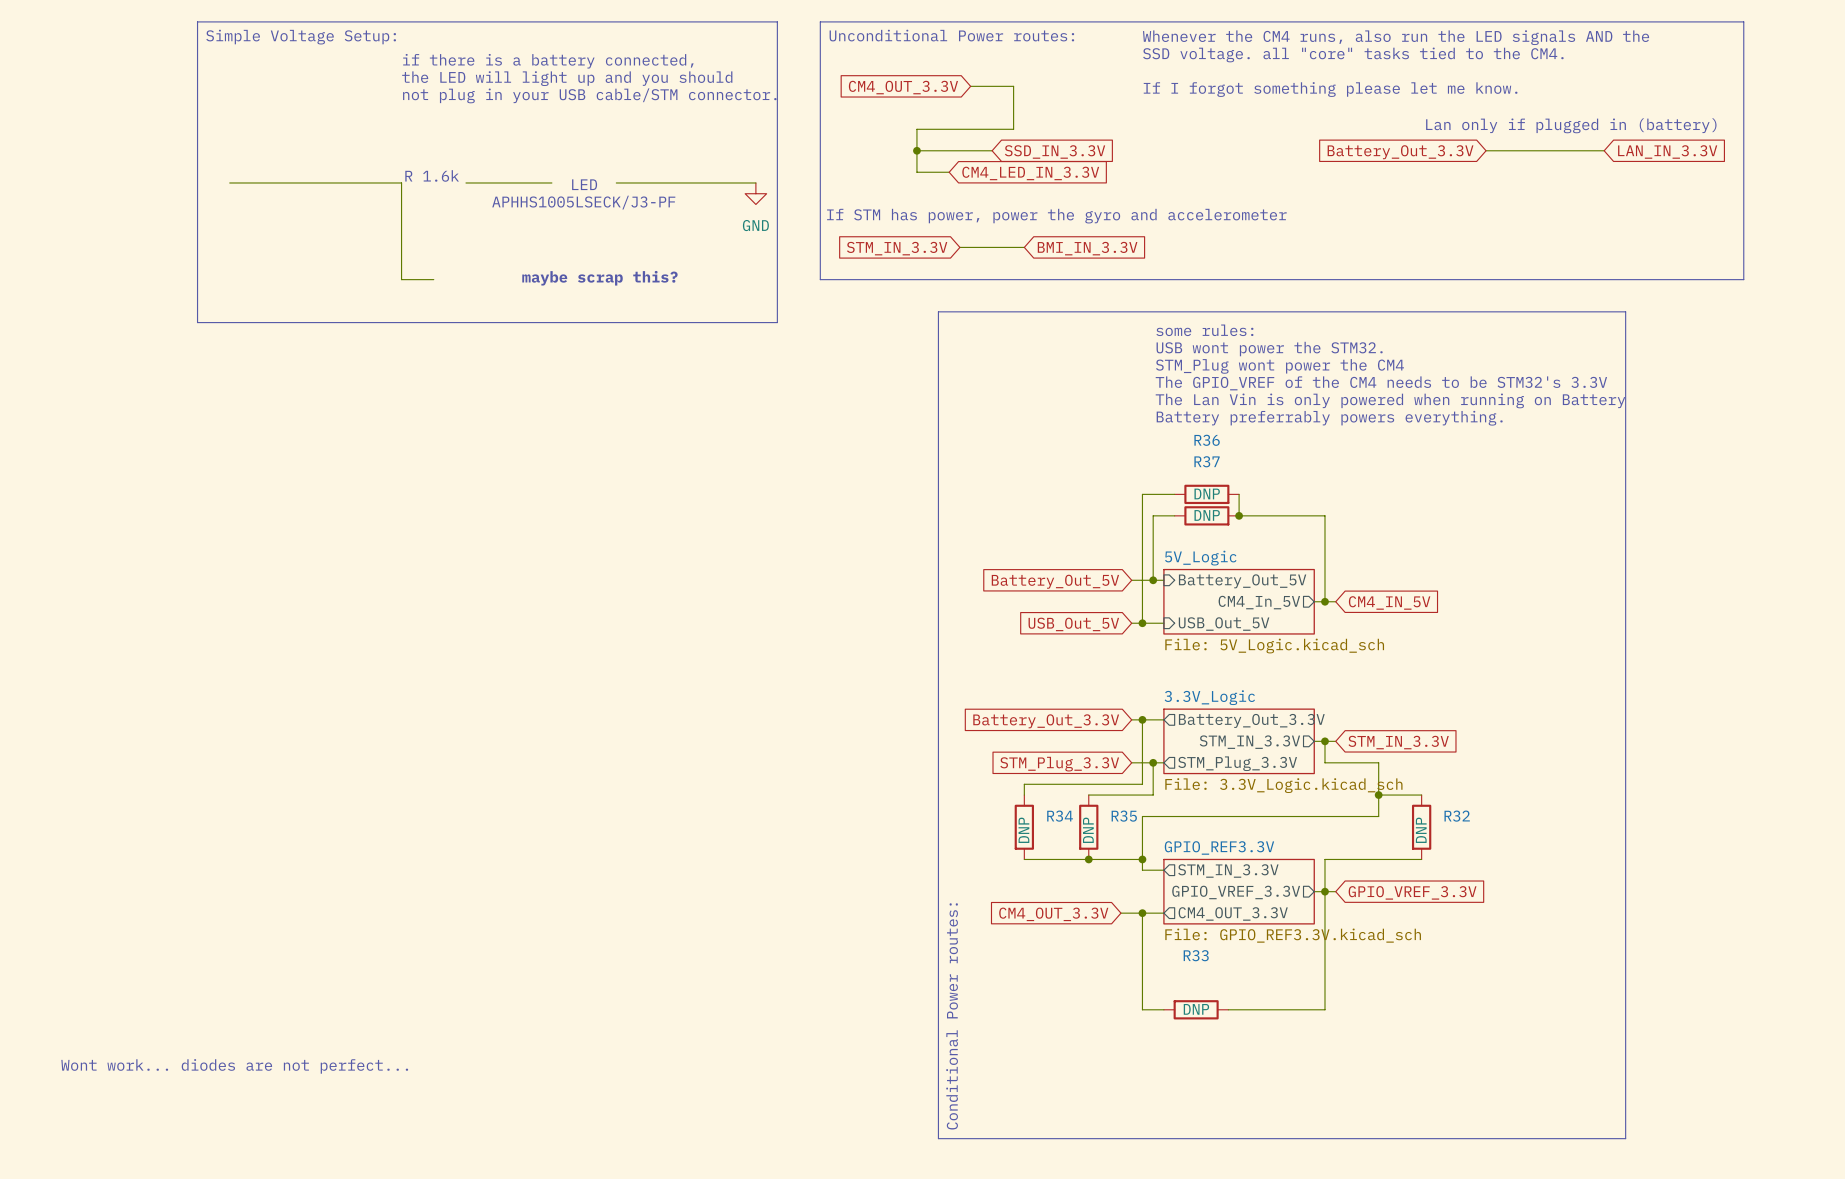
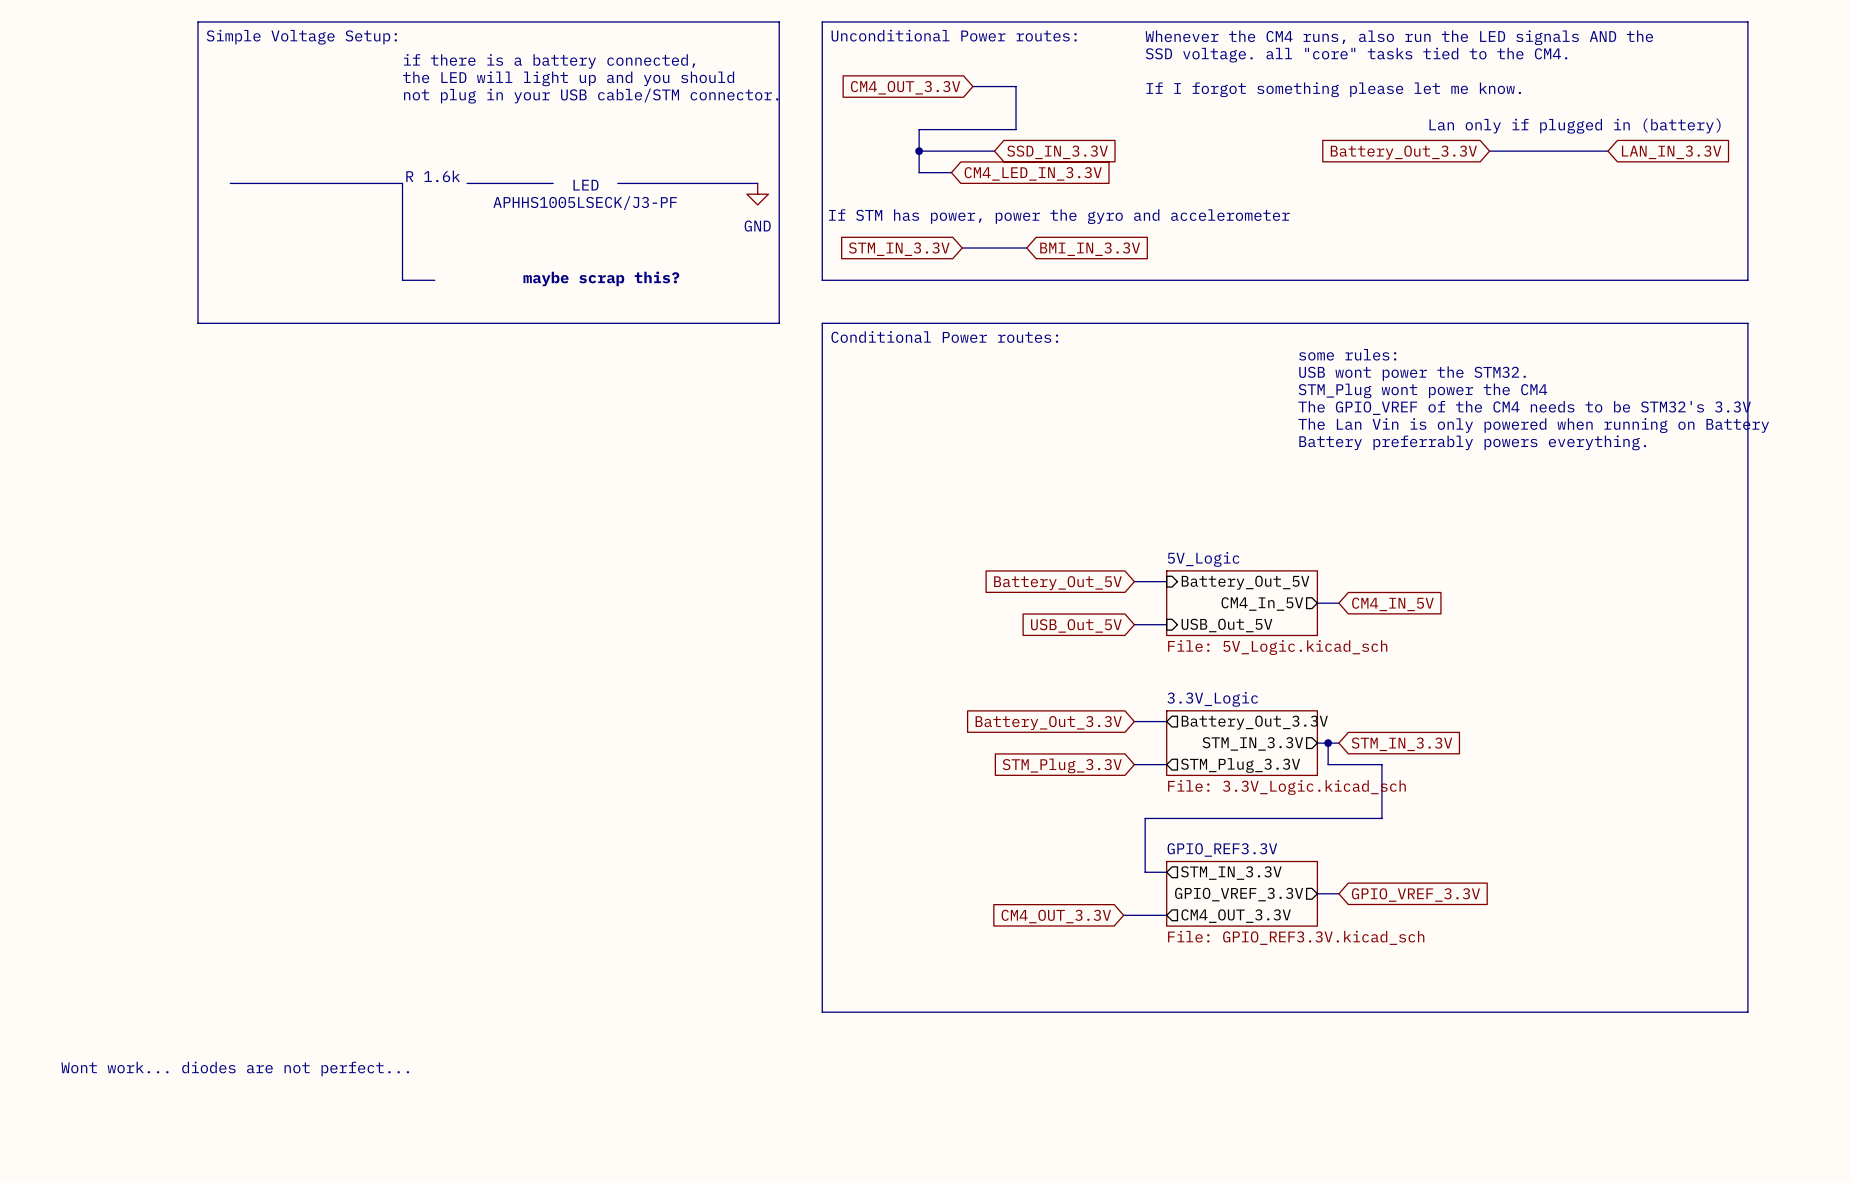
line: (938, 311) (1625, 311) (1625, 1138) (938, 1138) (938, 311) -> (822, 323) (822, 1012) (1747, 1012) (1747, 323) (822, 323)
text position: some rules: (1204, 330) -> some rules: (1347, 354)
text: none -> Conditional Power routes: (944, 337)
text position: USB wont power the STM32. (1269, 349) -> USB wont power the STM32. (1412, 373)
text position: STM_Plug wont power the CM4 (1280, 366) -> STM_Plug wont power the CM4 (1422, 390)
text position: The GPIO_VREF of the CM4 needs to be STM32's 3.3V (1381, 383) -> The GPIO_VREF of the CM4 needs to be STM32's 3.3V (1524, 407)
text position: The Lan Vin is only powered when running on Battery (1390, 400) -> The Lan Vin is only powered when running on Battery (1533, 425)
text position: Battery preferrably powers everything. (1329, 418) -> Battery preferrably powers everything. (1472, 442)
wire: (1174, 494) (1142, 494) (1142, 623) -> none
R36: DNP (1206, 494) -> none
wire: (1239, 494) (1239, 515) (1324, 515) (1324, 601) -> none
wire: (1174, 515) (1153, 515) (1153, 580) -> none
R37: DNP (1206, 515) -> none
junction: (1239, 515) -> none
junction: (1153, 580) -> none
junction: (1324, 601) -> none
junction: (1142, 623) -> none
wire: (1142, 719) (1142, 784) (1024, 784) (1024, 795) -> none
junction: (1142, 719) -> none
wire: (1153, 762) (1153, 795) (1088, 795) -> none
junction: (1153, 762) -> none
wire: (1378, 795) (1421, 795) -> none
junction: (1378, 795) -> none
R34: DNP (1024, 827) -> none
R35: DNP (1088, 827) -> none
R32: DNP (1421, 827) -> none
wire: (1024, 859) (1142, 859) -> none
junction: (1088, 859) -> none
junction: (1142, 859) -> none
wire: (1421, 859) (1324, 859) (1324, 1009) (1228, 1009) -> none
junction: (1324, 891) -> none
wire: (1142, 913) (1142, 1009) (1163, 1009) -> none
junction: (1142, 913) -> none
R33: DNP (1196, 1009) -> none
text: Conditional Power routes: (952, 1016) -> none

